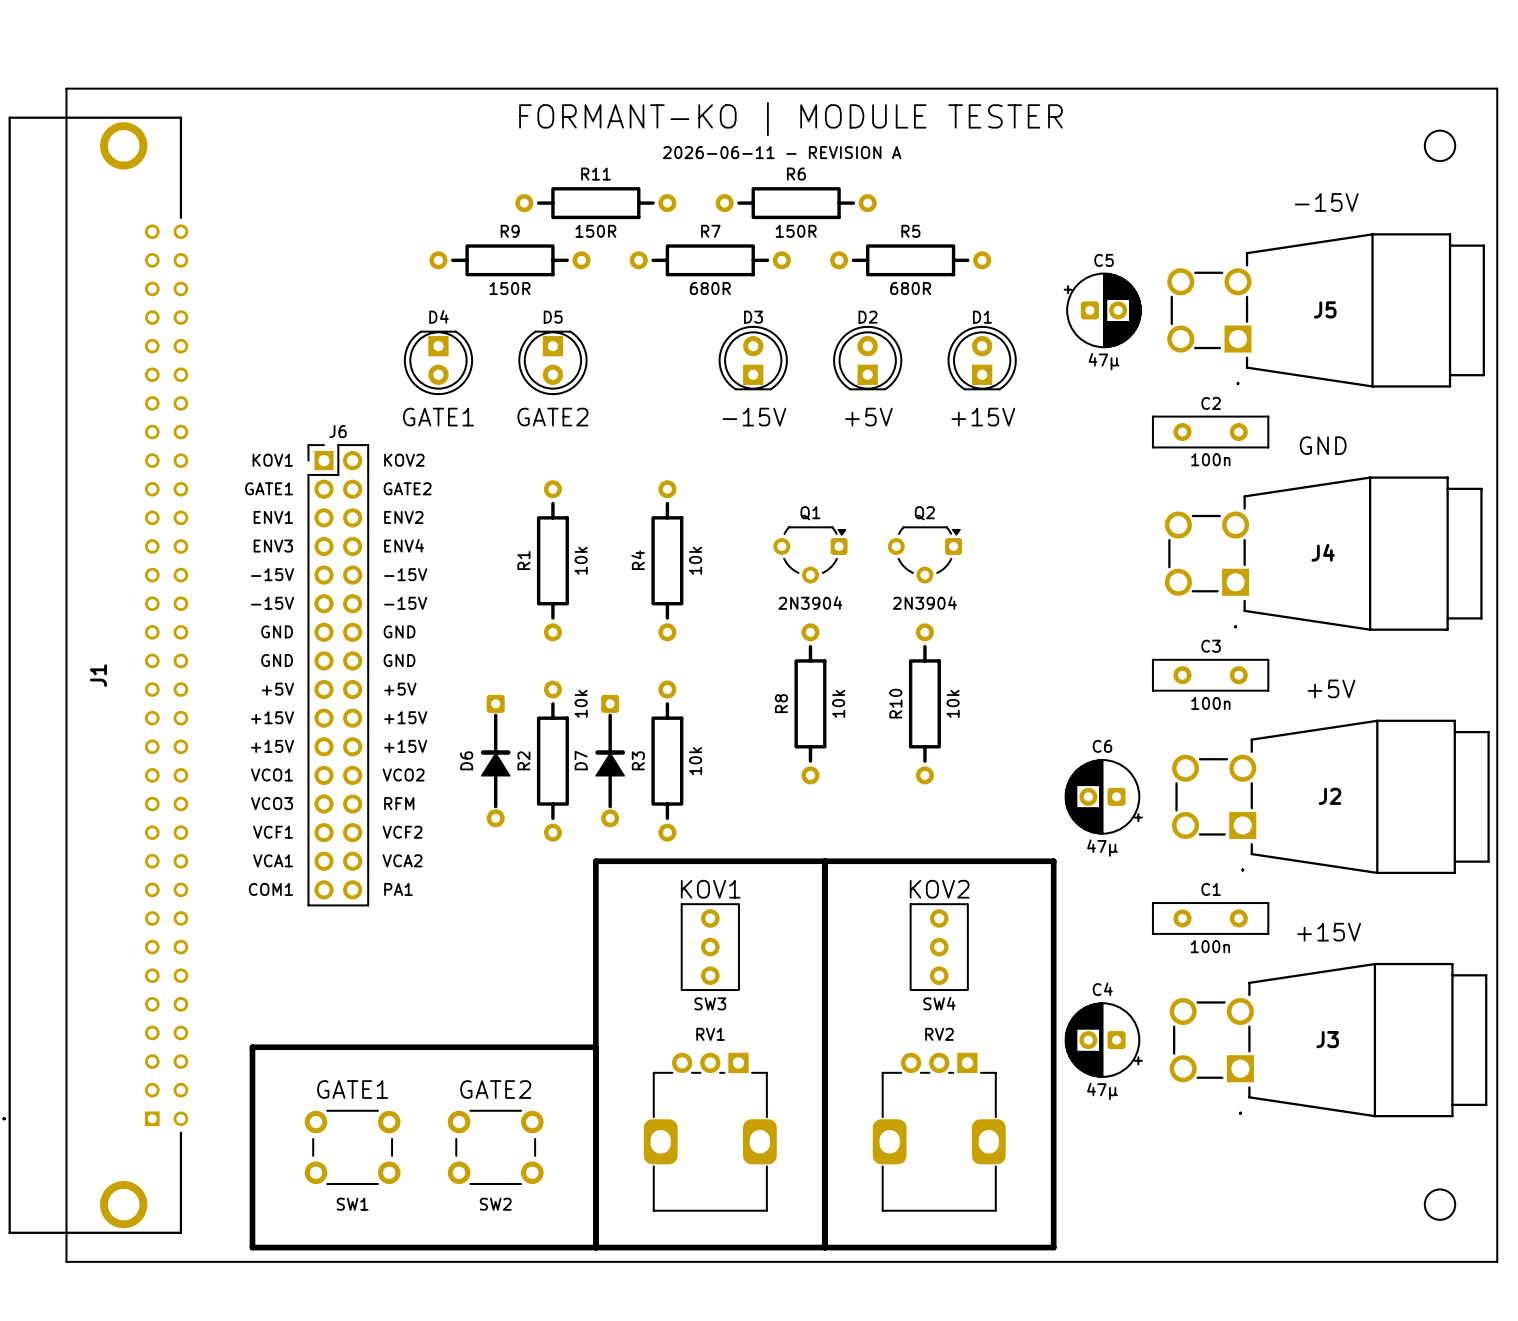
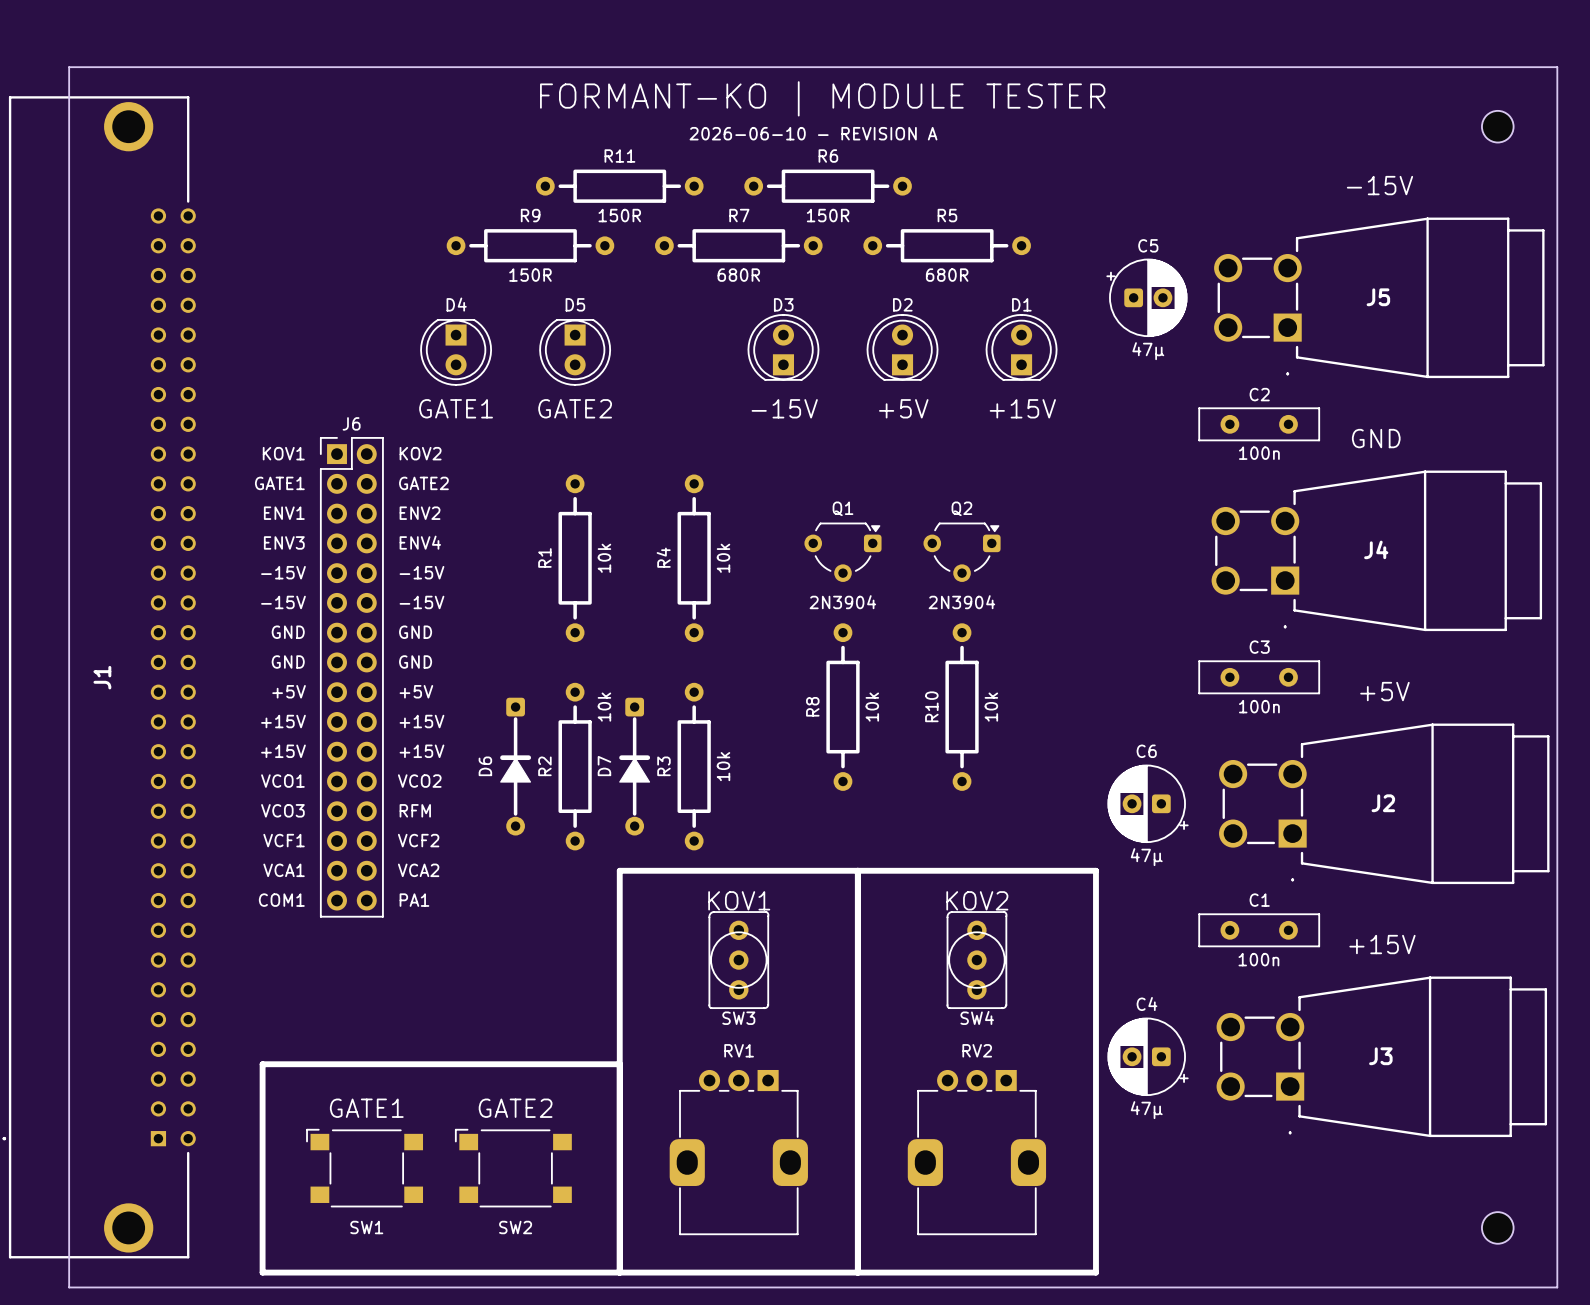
text: 2026-06-11 - REVISION A (782, 152) -> 2026-06-10 - REVISION A (813, 133)
SW3 footprint: [681, 903, 740, 991] -> [708, 911, 770, 1009]
SW4 footprint: [910, 903, 969, 991] -> [946, 911, 1008, 1009]
SW1 footprint: [304, 1110, 401, 1185] -> [306, 1129, 424, 1208]
SW2 footprint: [447, 1110, 544, 1185] -> [455, 1129, 572, 1208]

